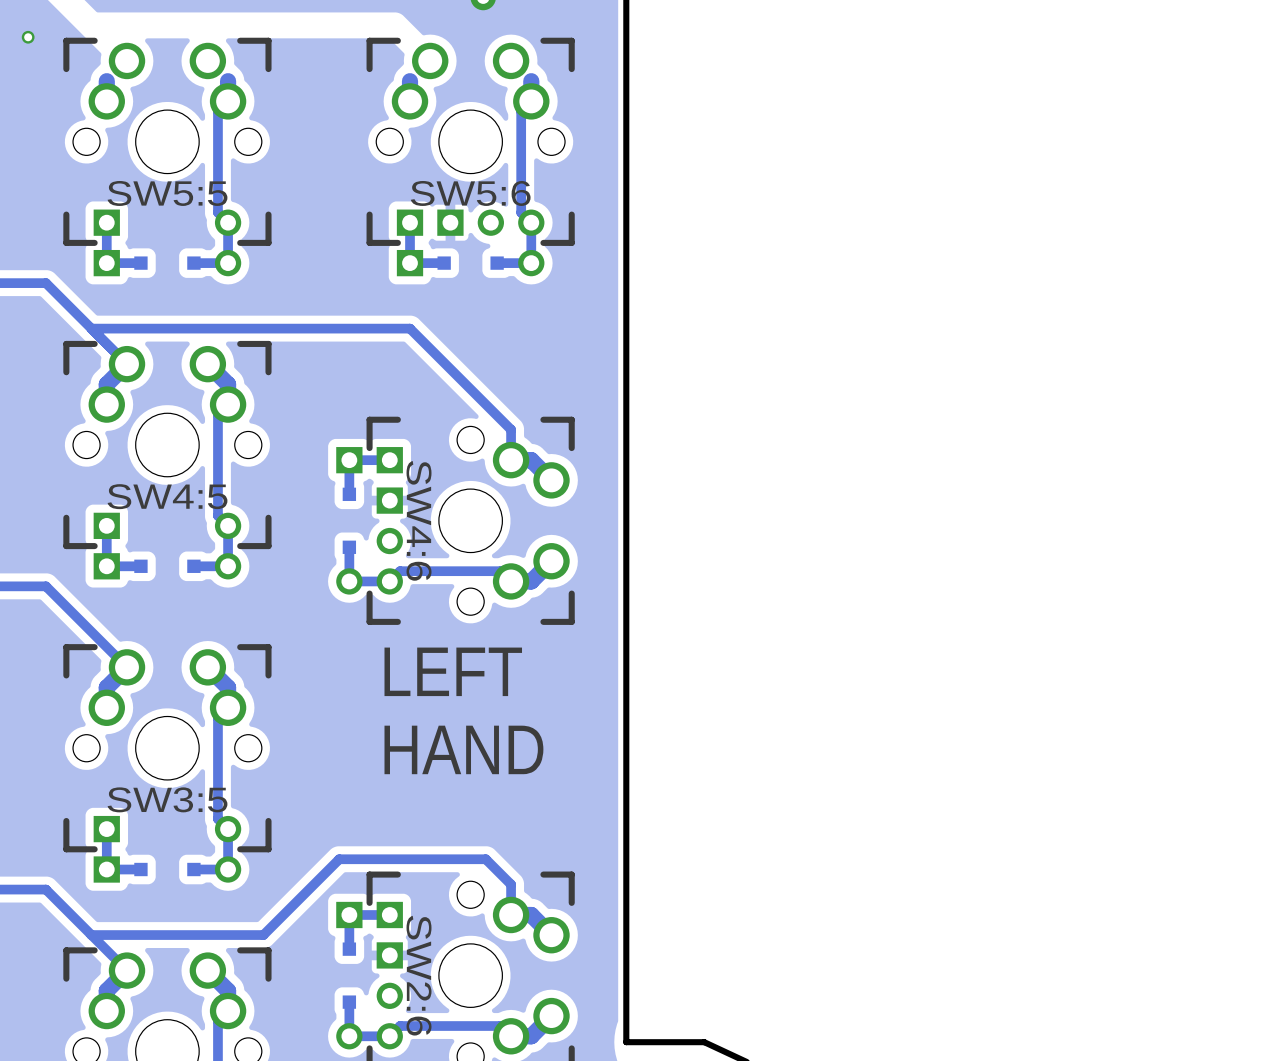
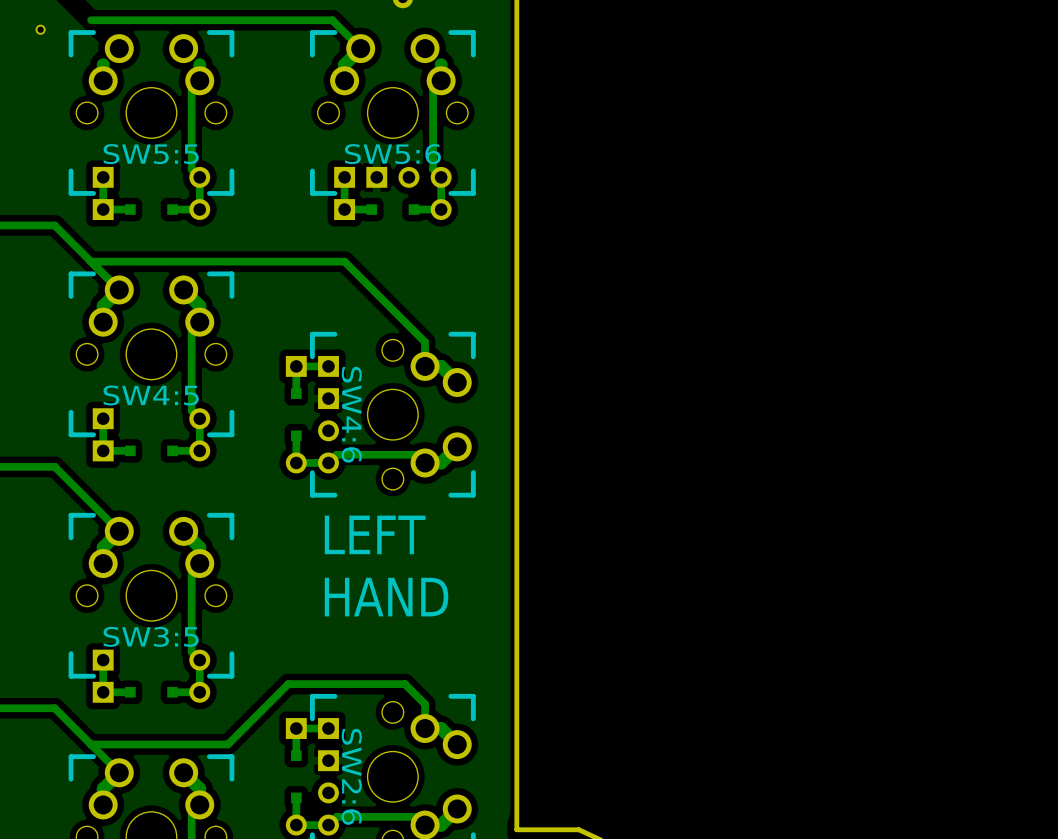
track: none -> (91, 20) (332, 20) (360, 48) (344, 64)

